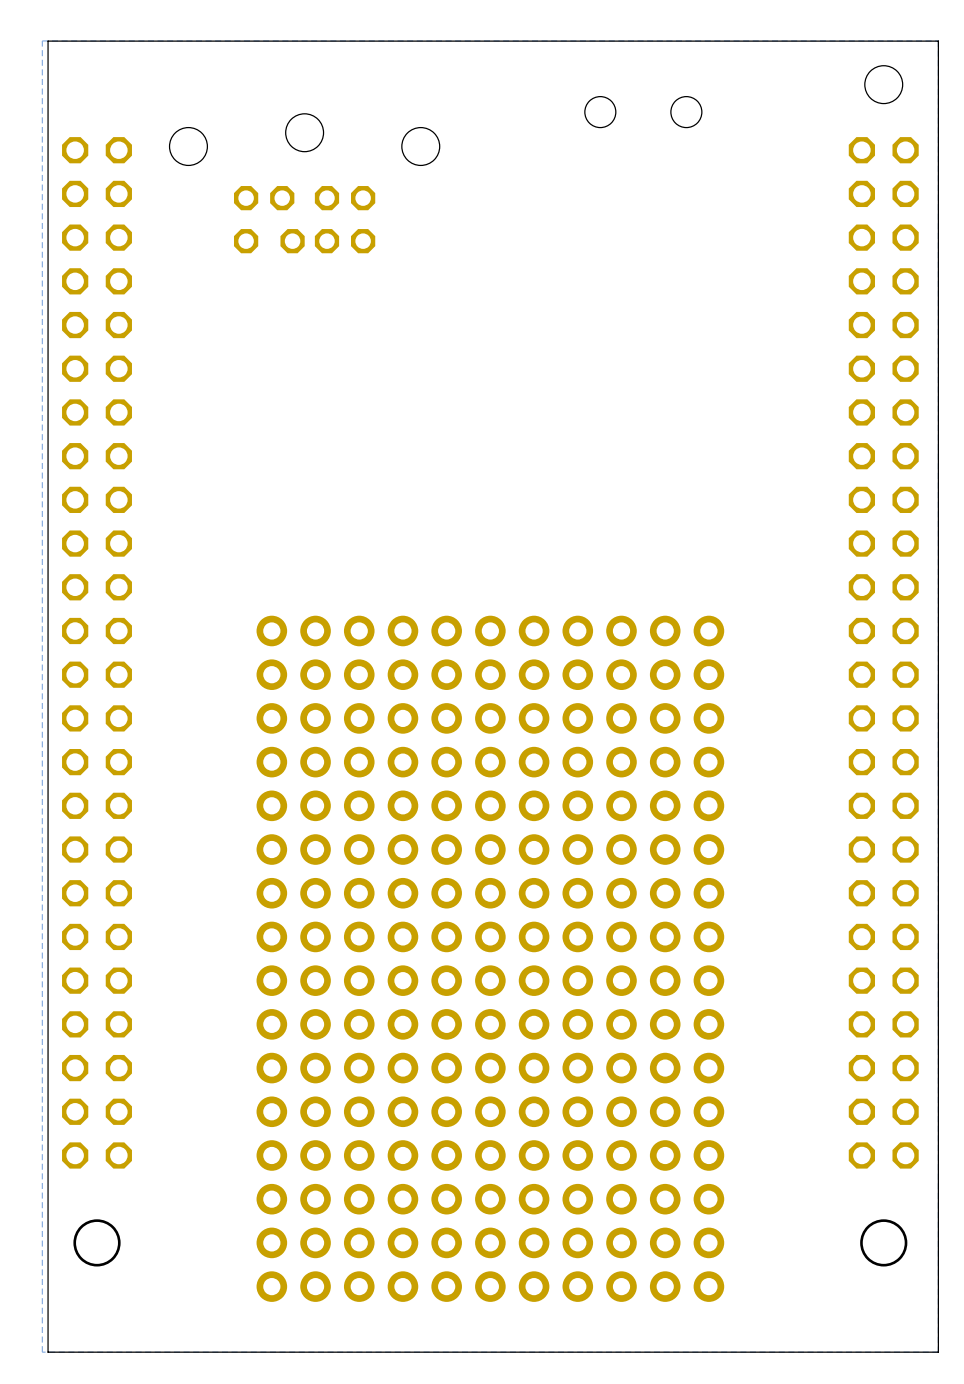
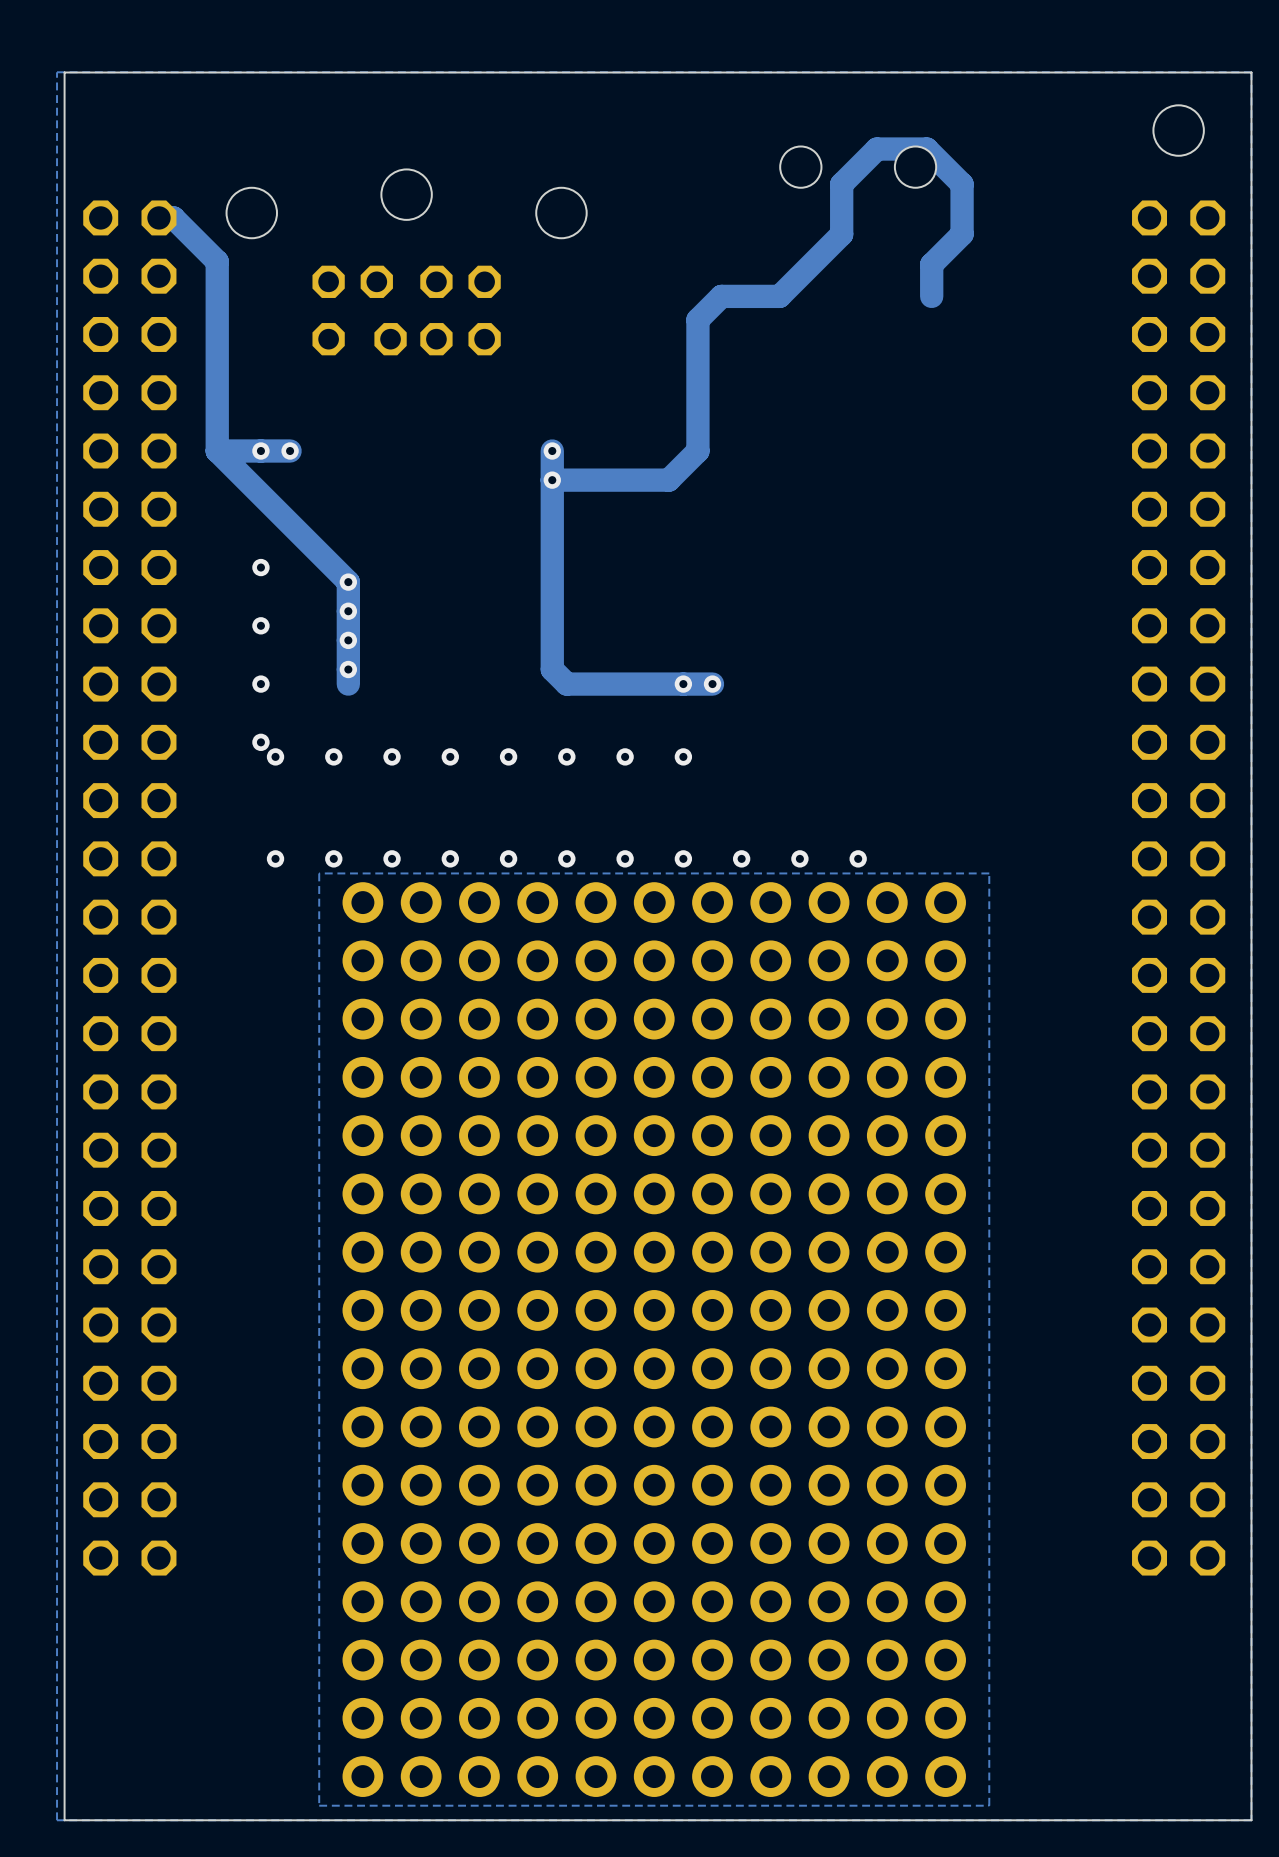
track: none -> (158, 217) (173, 217) (217, 261) (217, 451)
track: none -> (931, 296) (931, 264) (962, 234) (962, 184) (926, 149) (876, 149) (841, 184) (841, 234) (779, 296) (721, 296) (697, 319) (697, 451) (668, 480) (552, 480)
track: none -> (217, 451) (348, 582) (348, 684)
via: none -> (260, 451)
track: none -> (290, 451) (217, 451)
via: none -> (290, 451)
track: none -> (552, 451) (552, 669) (566, 684) (712, 684)
via: none -> (552, 451)
via: none -> (552, 480)
via: none -> (260, 567)
via: none -> (348, 582)
via: none -> (348, 611)
via: none -> (260, 625)
via: none -> (348, 640)
via: none -> (348, 669)
via: none -> (260, 684)
via: none -> (683, 684)
via: none -> (712, 684)
via: none -> (260, 742)
via: none -> (275, 756)
via: none -> (333, 756)
via: none -> (392, 756)
via: none -> (450, 756)
via: none -> (508, 756)
via: none -> (566, 756)
via: none -> (625, 756)
via: none -> (683, 756)
via: none -> (275, 858)
via: none -> (333, 858)
via: none -> (392, 858)
via: none -> (450, 858)
via: none -> (508, 858)
via: none -> (566, 858)
via: none -> (625, 858)
via: none -> (683, 858)
via: none -> (741, 858)
via: none -> (799, 858)
via: none -> (858, 858)
zone outline: none -> (989, 873) (319, 873) (319, 1805) (989, 1805) (989, 873)
part position: (490, 958) -> (654, 1339)
round board edge: [73, 1219, 121, 1267] -> none
round board edge: [860, 1219, 908, 1267] -> none

